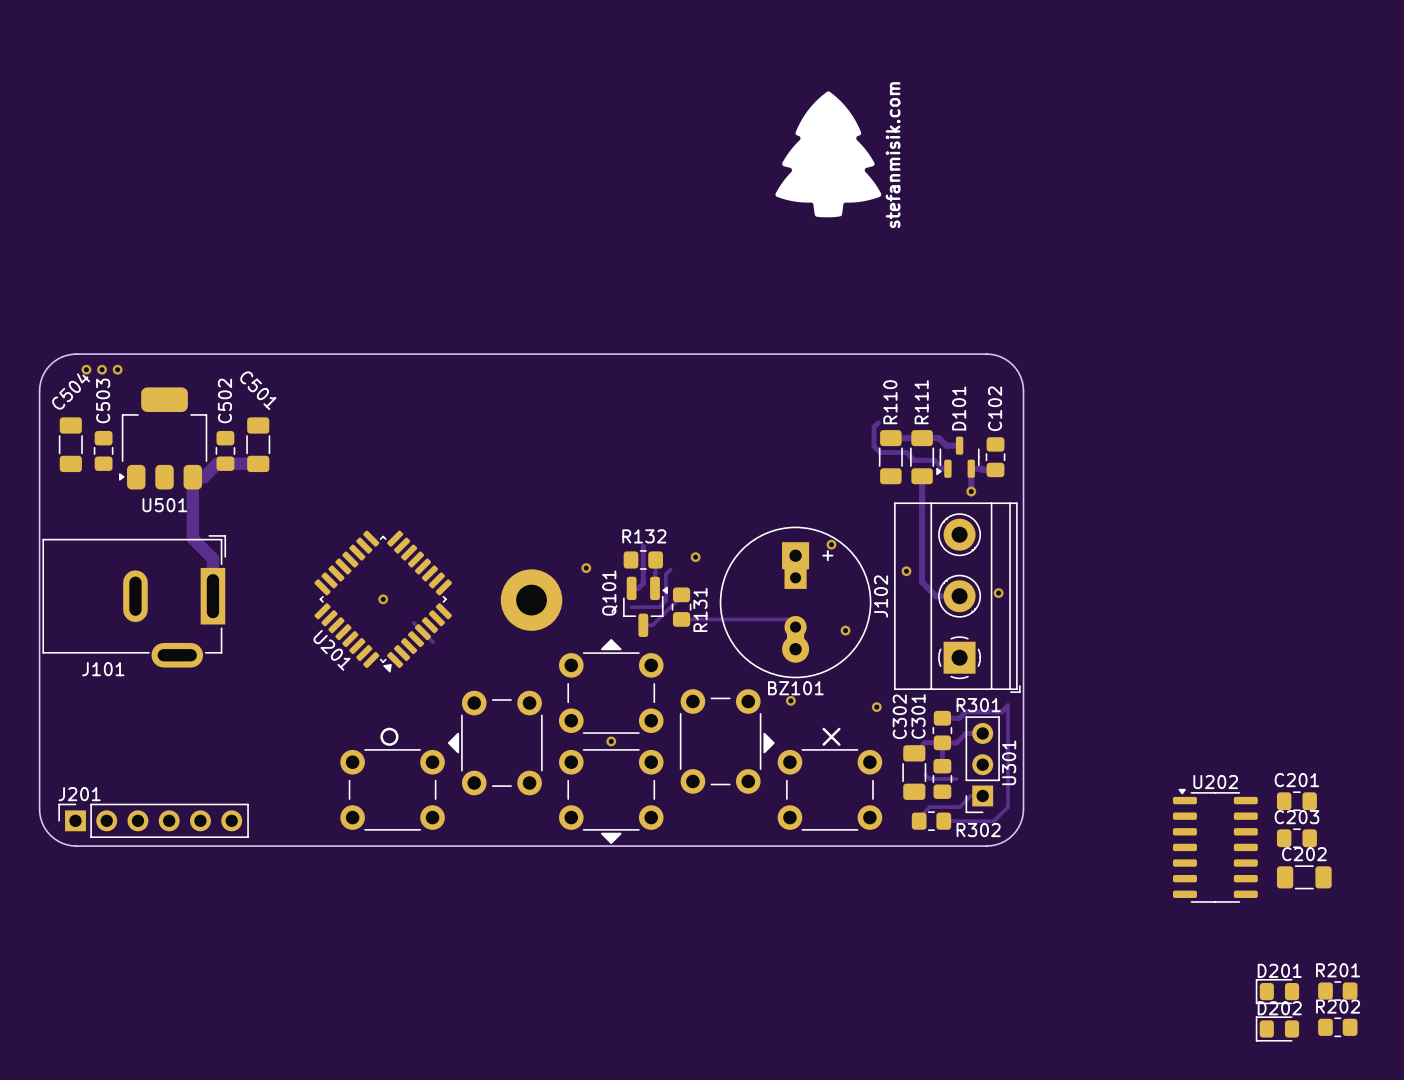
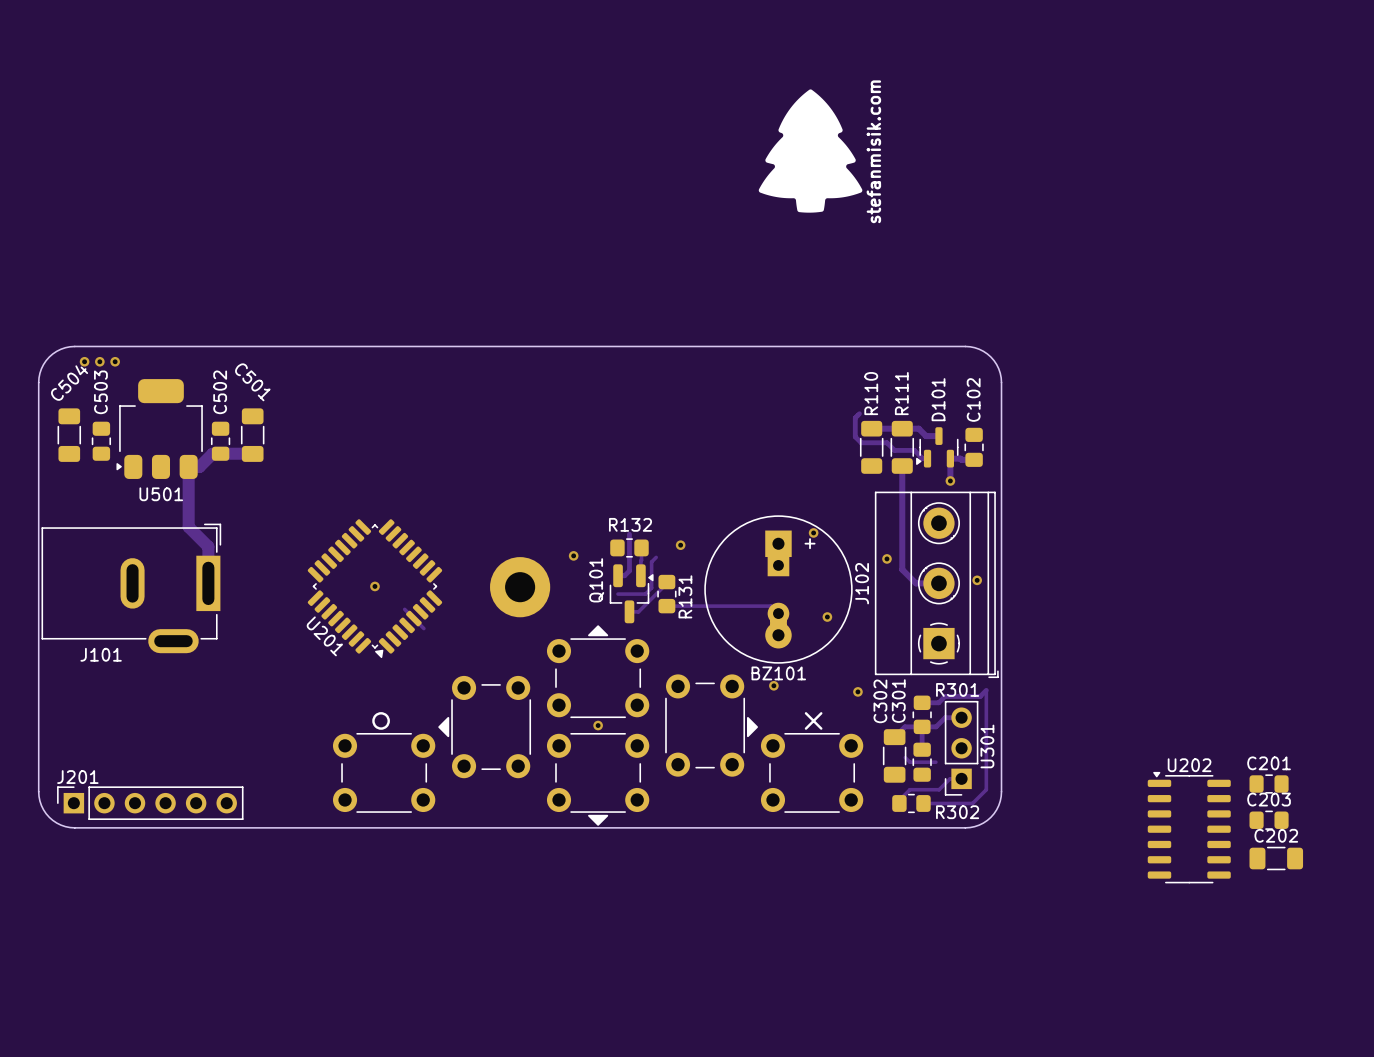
D201: (1277, 991) -> none
R201: (1337, 991) -> none
R202: (1337, 1027) -> none
D202: (1277, 1028) -> none

